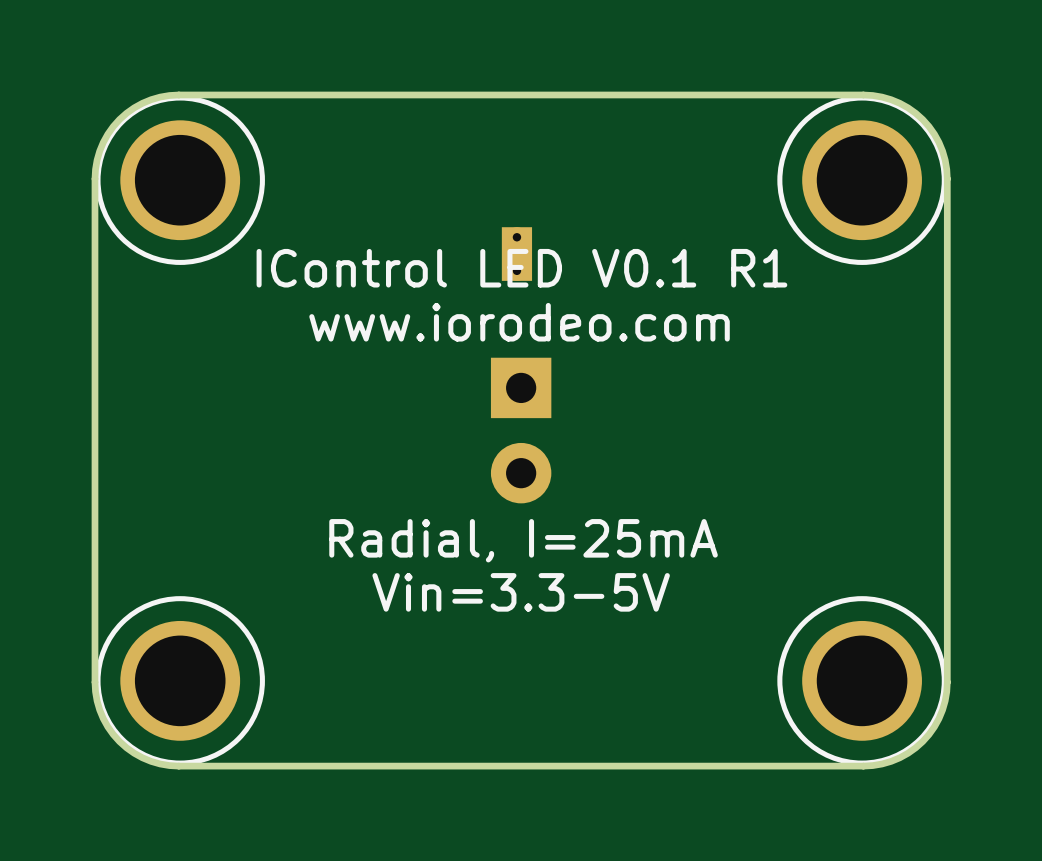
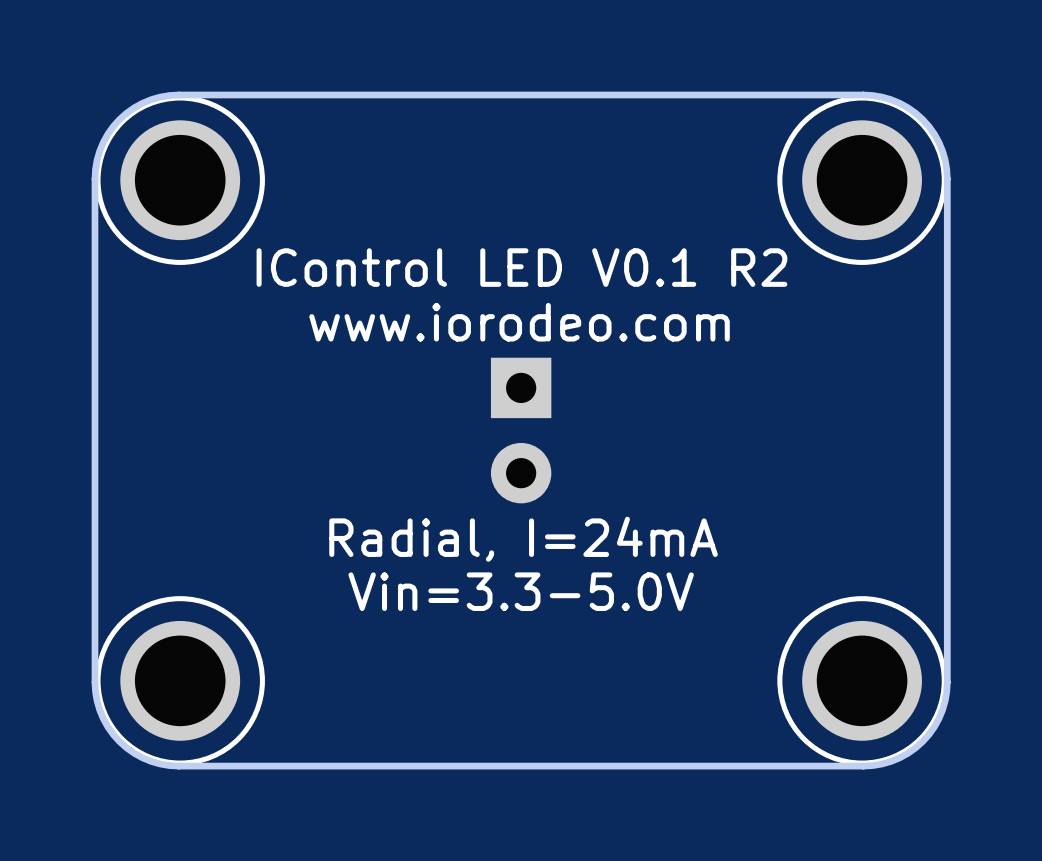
part: (516, 254) -> none
text: IControl LED V0.1 R1 (521, 268) -> IControl LED V0.1 R2 (521, 267)
text: Radial, I=25mA (523, 540) -> Radial, I=24mA (523, 539)
text: Vin=3.3-5V (521, 592) -> Vin=3.3-5.0V (521, 591)

